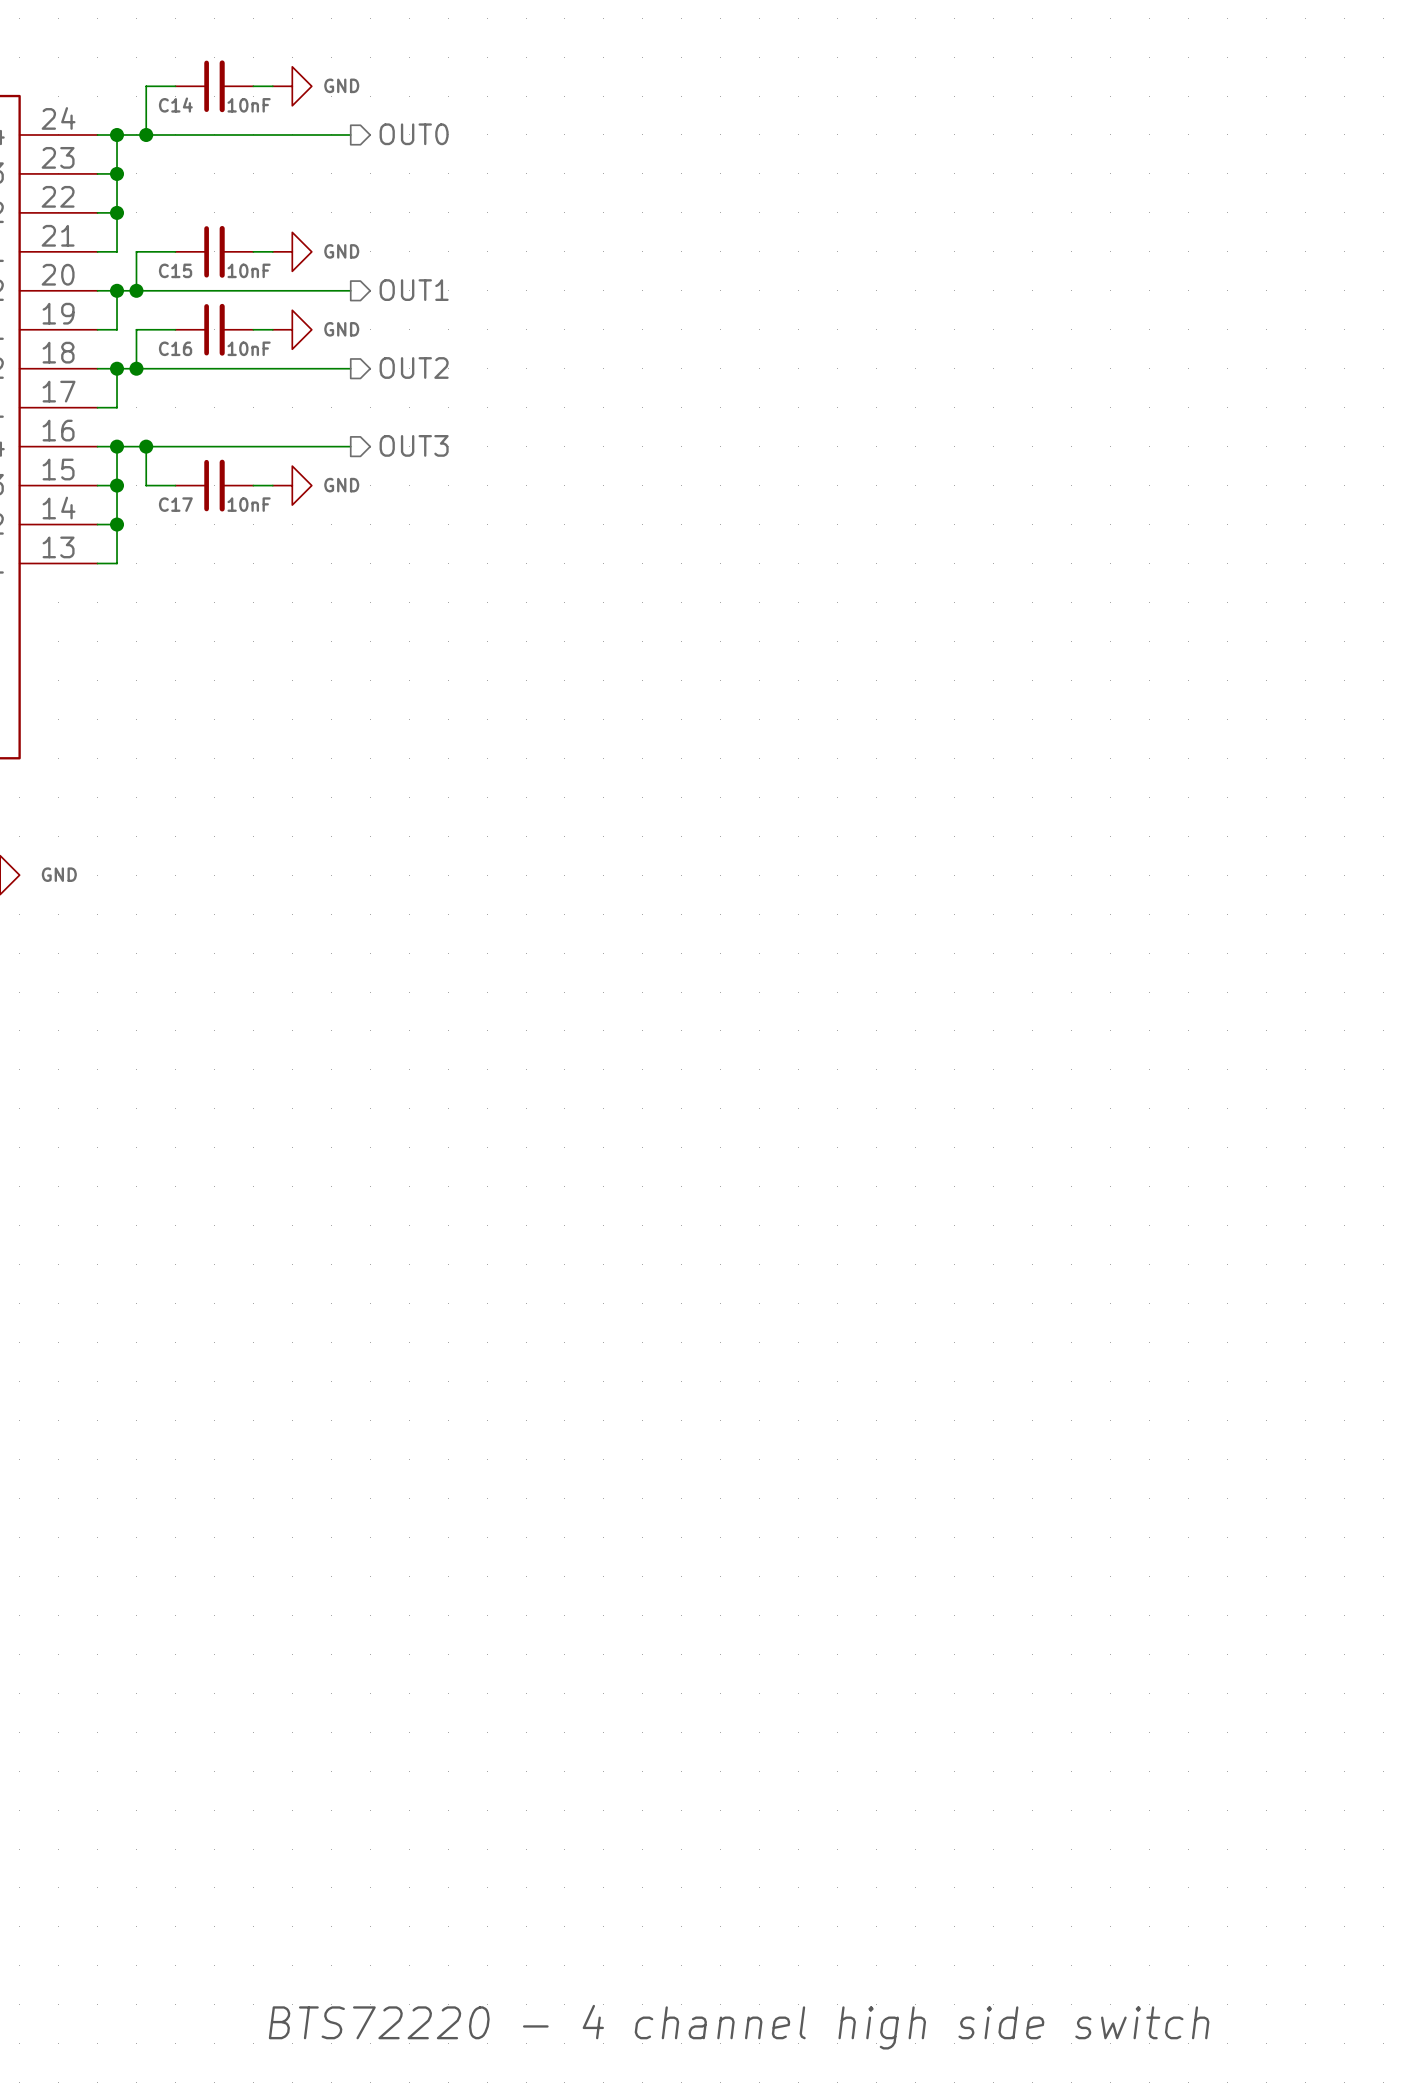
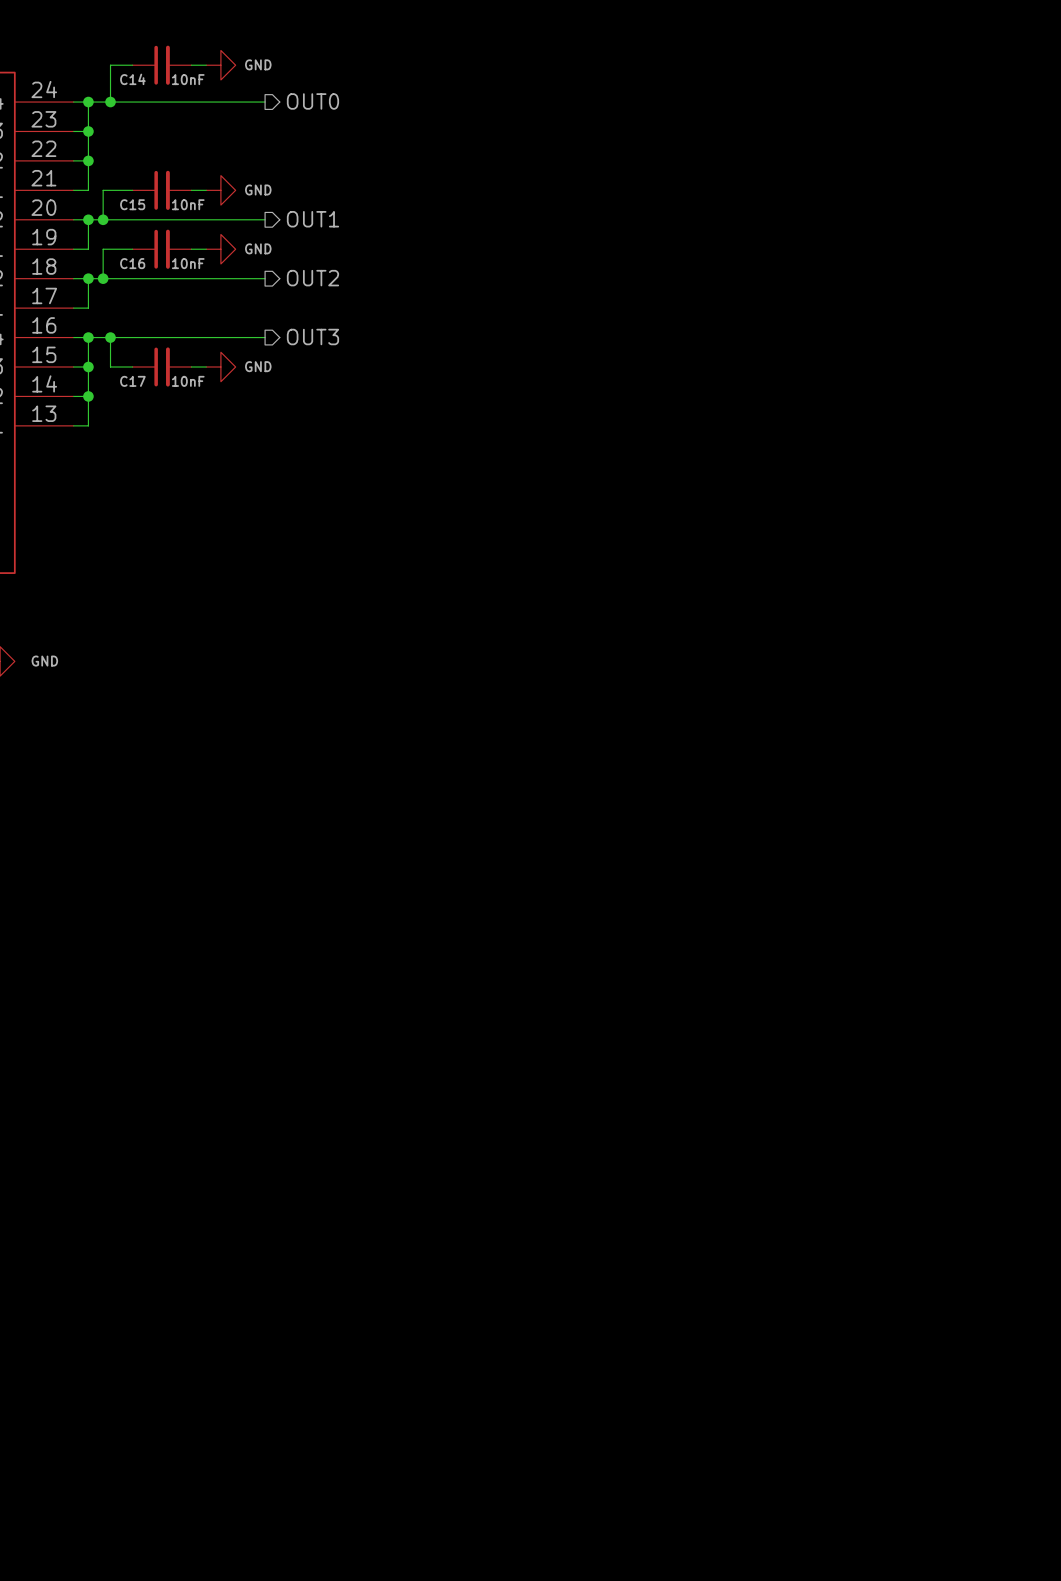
text: BTS72220 - 4 channel high side switch (739, 2027) -> none

